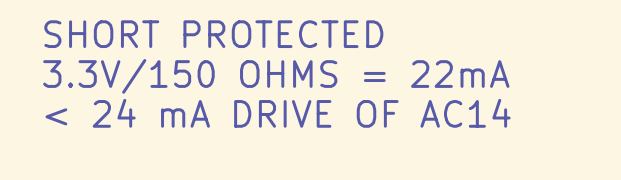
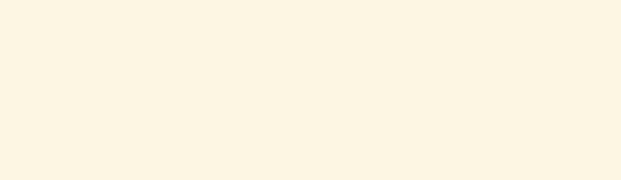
text: SHORT PROTECTED (213, 34) -> none
text: 3.3V/150 OHMS = 22mA (276, 76) -> none
text: < 24 mA DRIVE OF AC14 (278, 113) -> none

